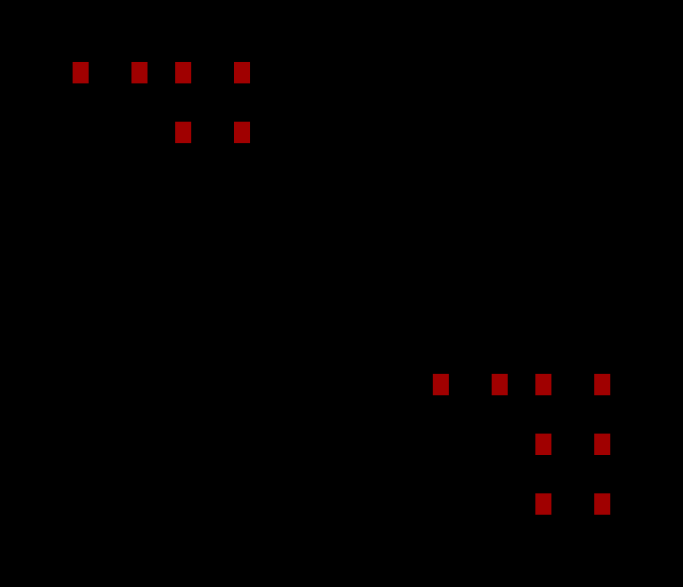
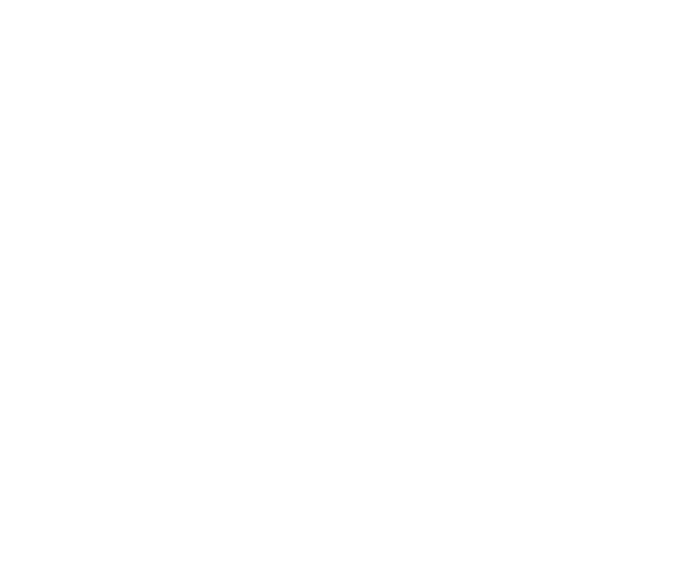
part: (110, 72) -> none
part: (212, 72) -> none
part: (212, 132) -> none
part: (470, 384) -> none
part: (572, 384) -> none
part: (572, 444) -> none
part: (572, 504) -> none

